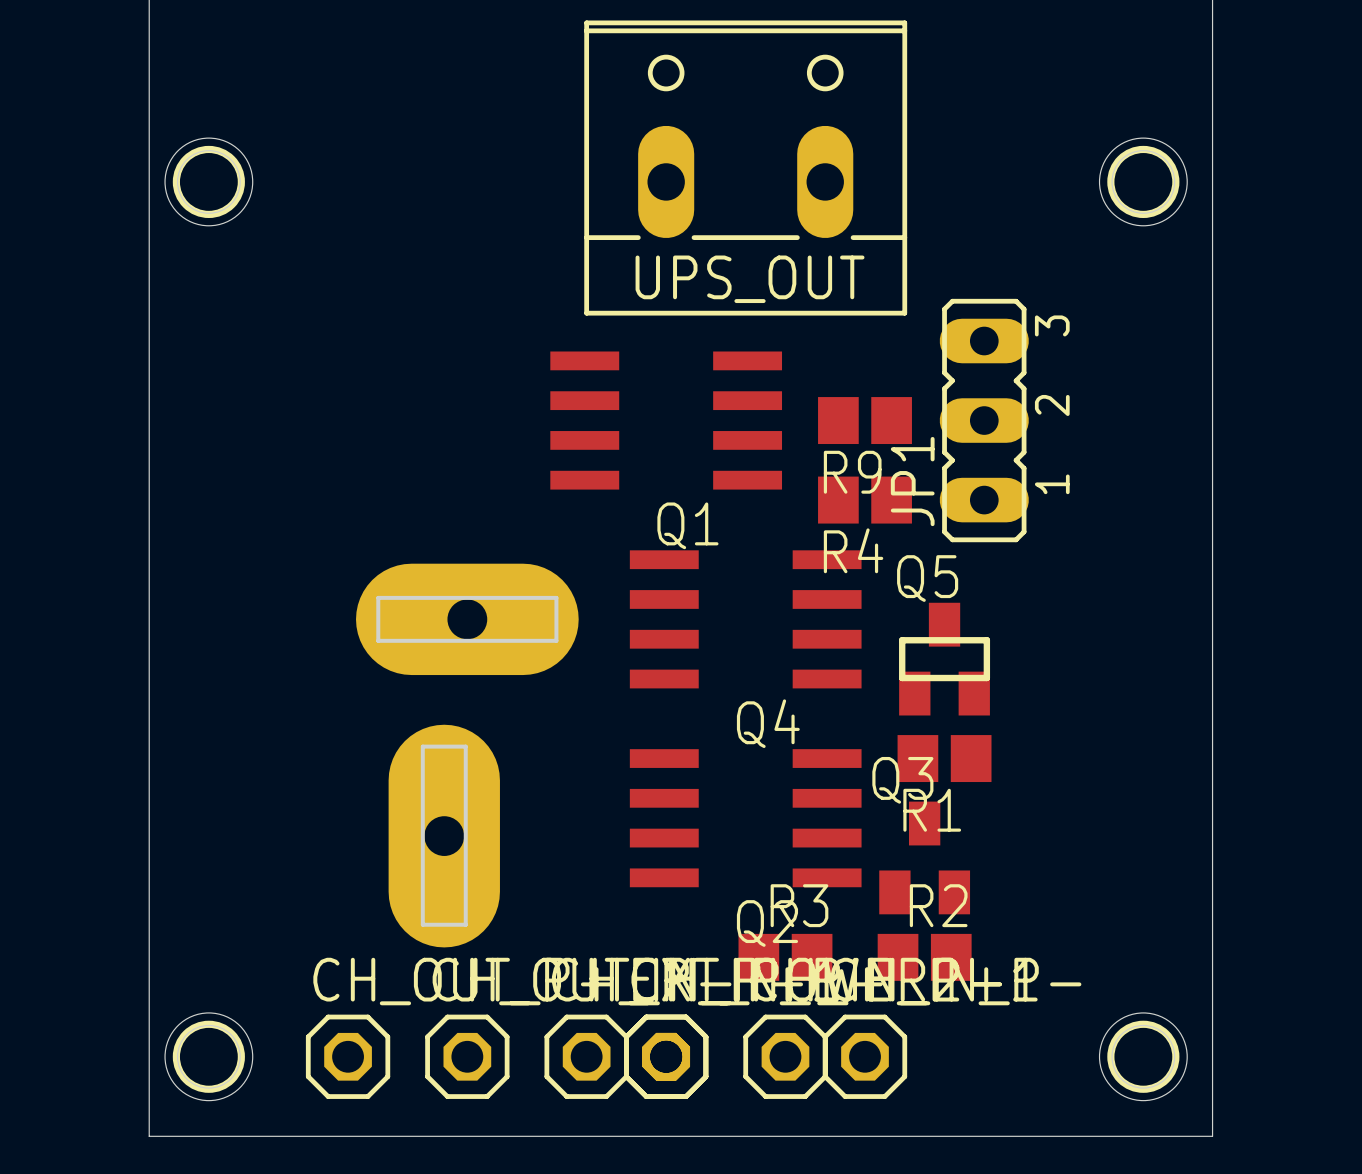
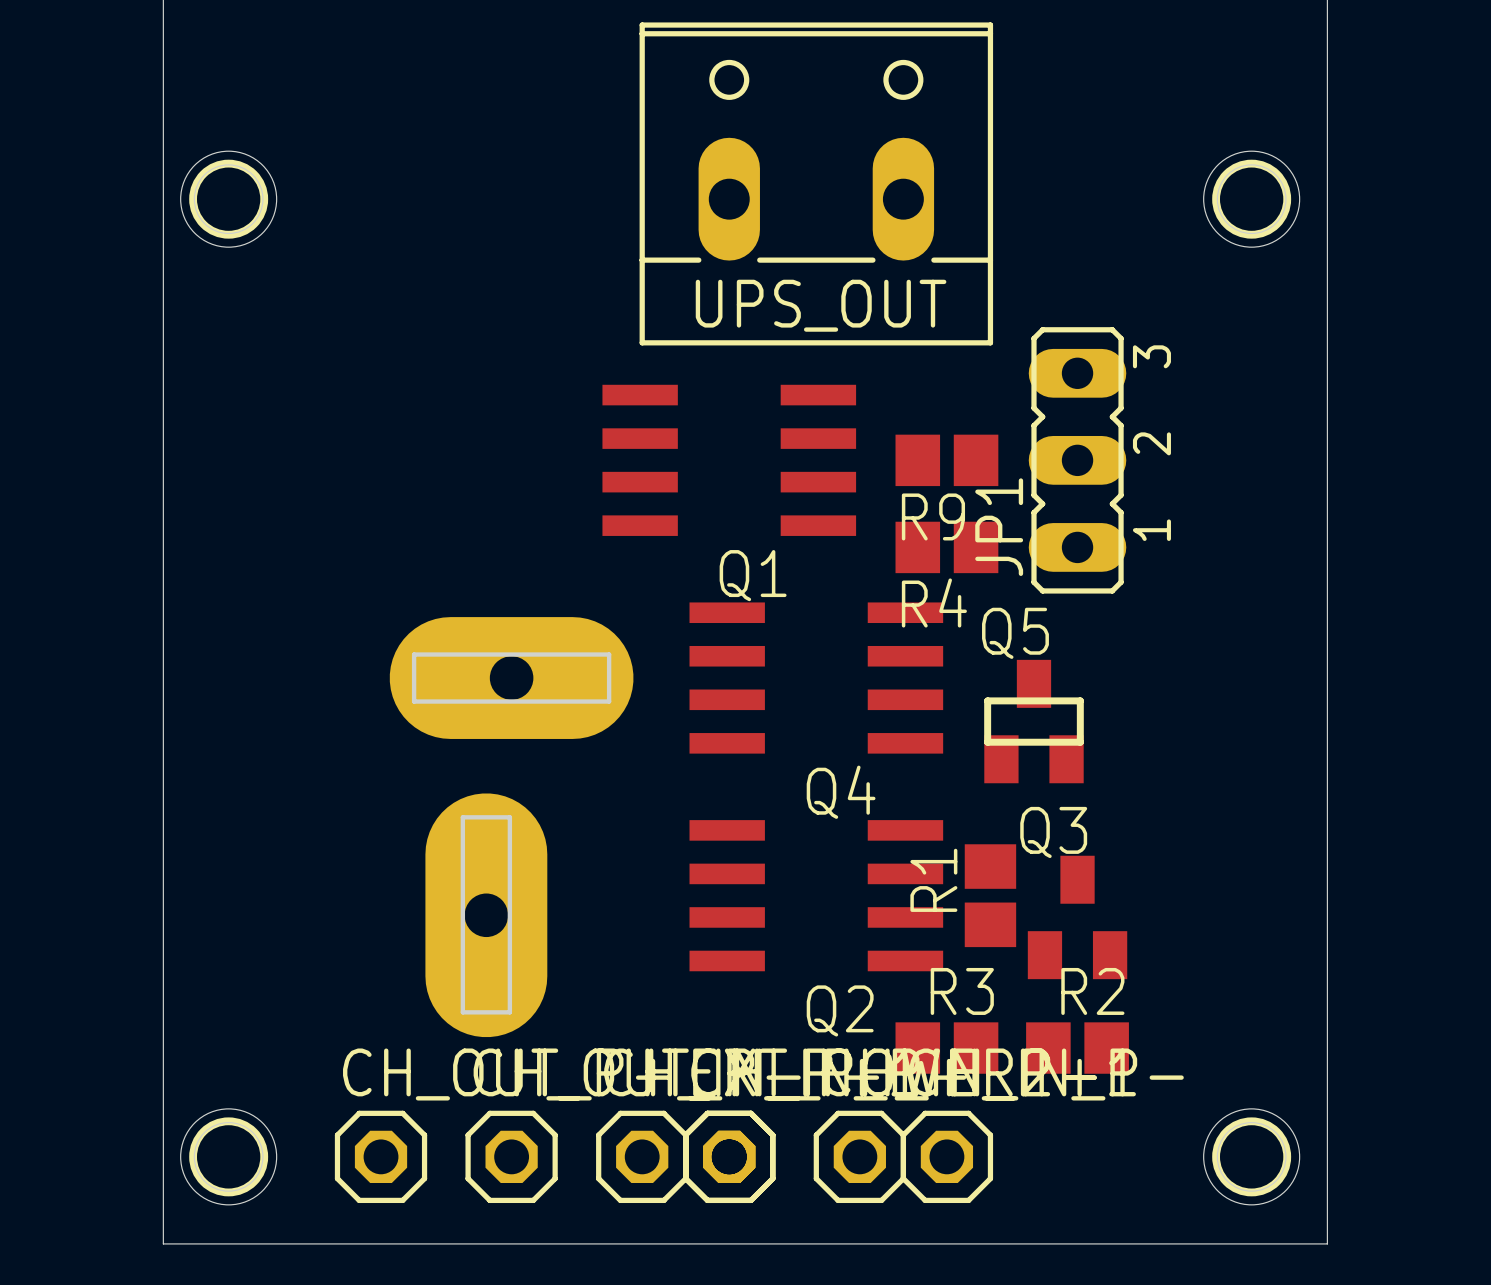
R1 rotation: 0° (944, 758) -> 90° clockwise (990, 895)
R1 position: (944, 758) -> (990, 895)
Q3 position: (924, 857) -> (1077, 917)
R3 position: (785, 957) -> (946, 1048)
R2 position: (924, 957) -> (1077, 1048)

